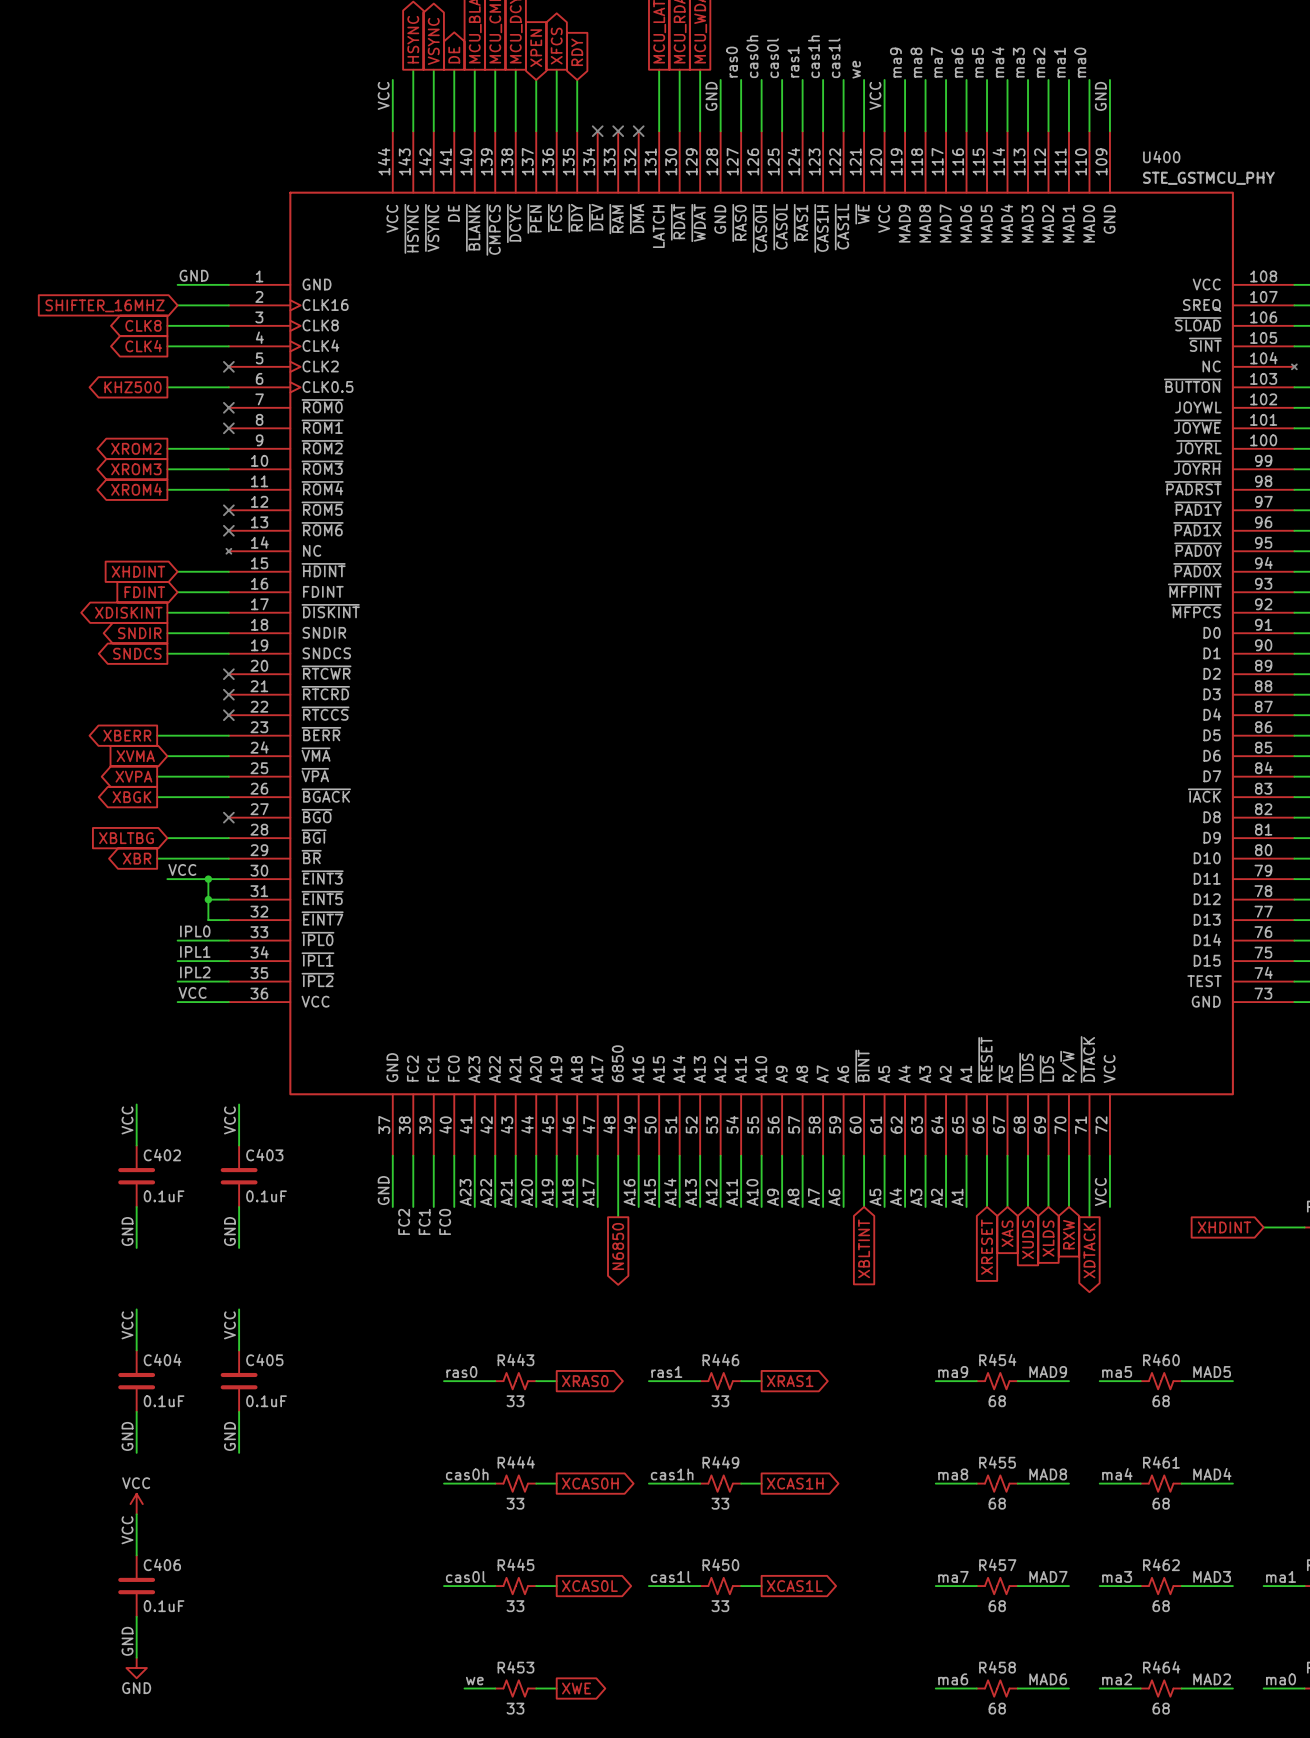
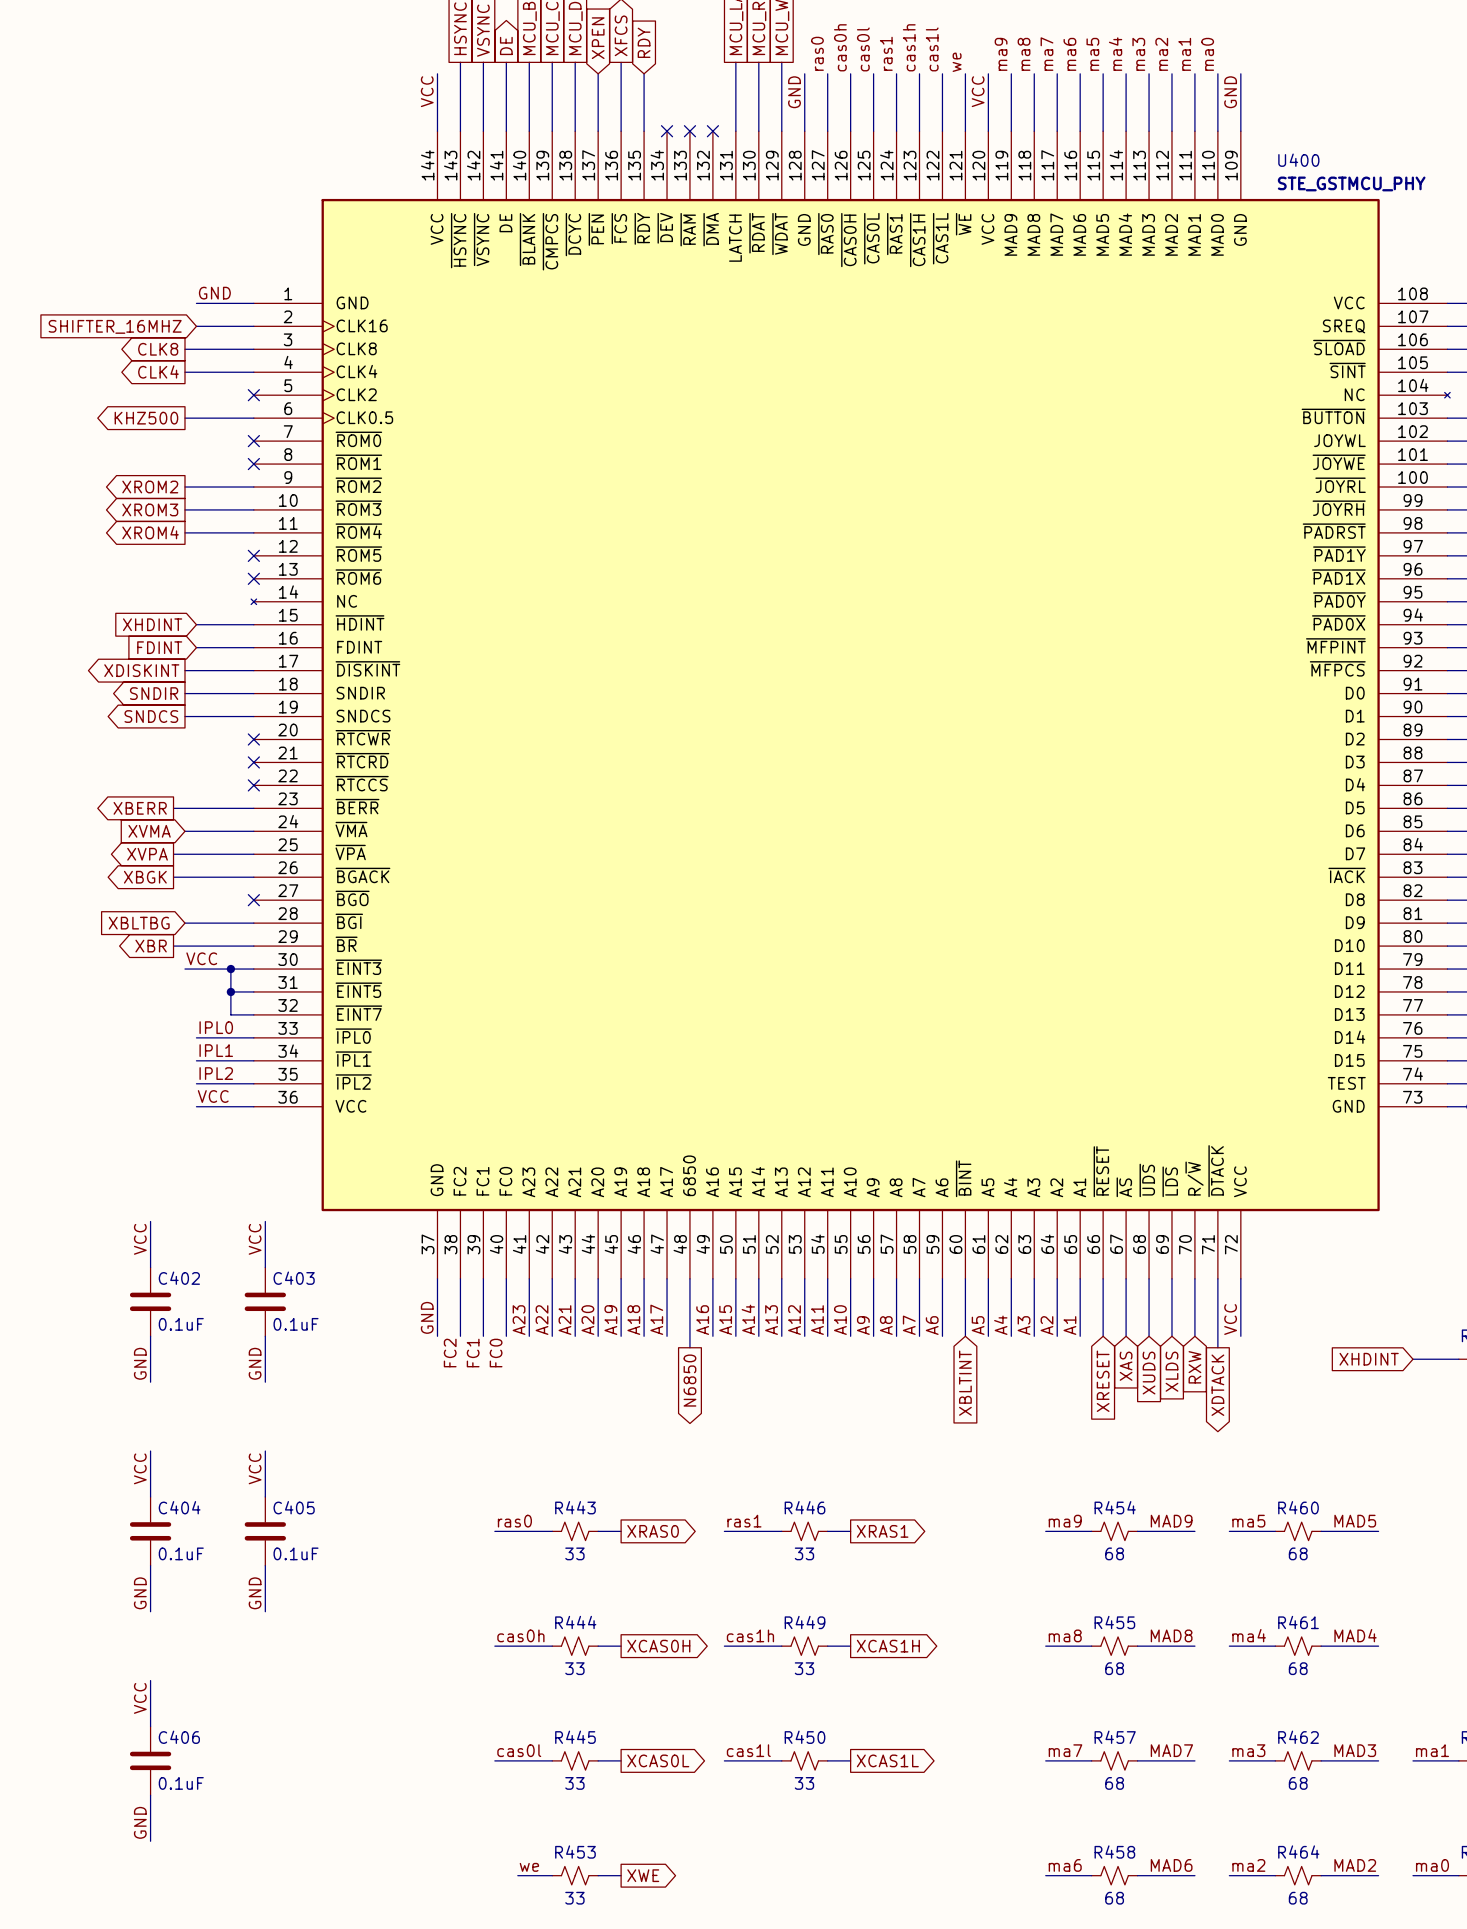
power symbol: VCC (136, 1504) -> none
power symbol: GND (136, 1668) -> none

